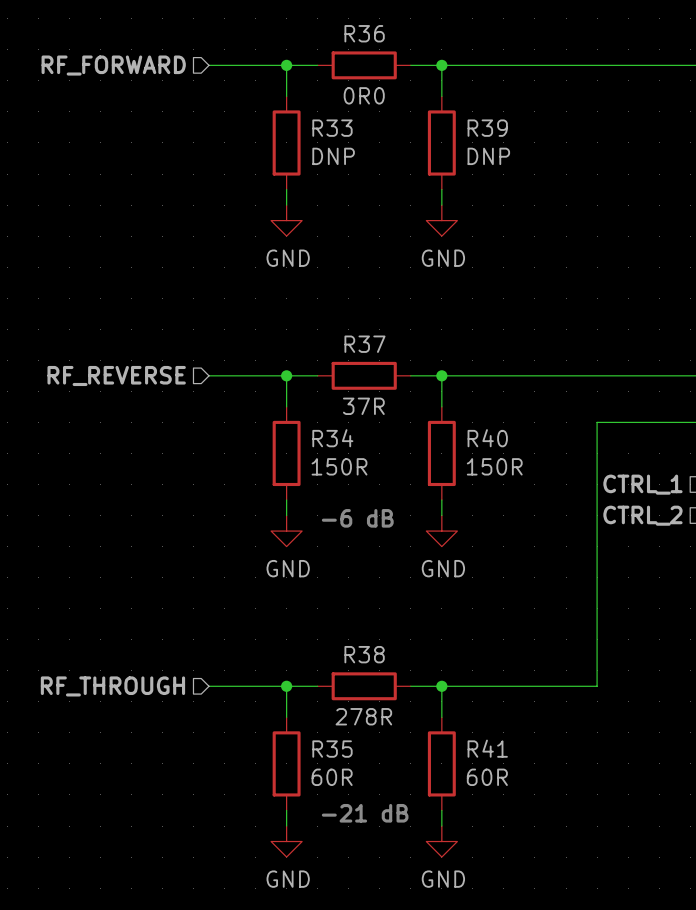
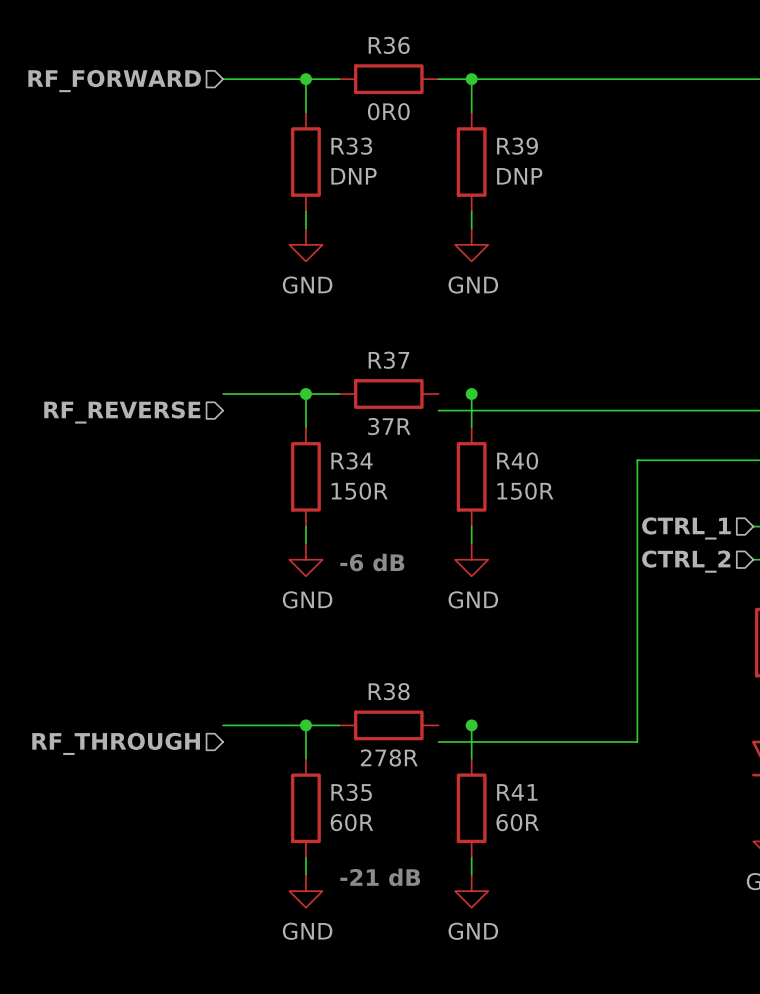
wire: (209, 375) (317, 375) -> (223, 394) (339, 394)
junction position: (286, 375) -> (305, 394)
R37 position: (364, 375) -> (388, 394)
junction position: (441, 375) -> (471, 394)
R34 position: (286, 453) -> (305, 476)
R40 position: (441, 453) -> (471, 476)
power symbol position: GND (286, 531) -> GND (305, 559)
power symbol position: GND (441, 531) -> GND (471, 559)
wire: (209, 686) (317, 686) -> (223, 725) (339, 725)
junction position: (286, 686) -> (305, 725)
R38 position: (364, 686) -> (388, 725)
junction position: (441, 686) -> (471, 725)
R35 position: (286, 763) -> (305, 808)
R41 position: (441, 763) -> (471, 808)
power symbol position: GND (286, 841) -> GND (305, 891)
power symbol position: GND (441, 841) -> GND (471, 891)

